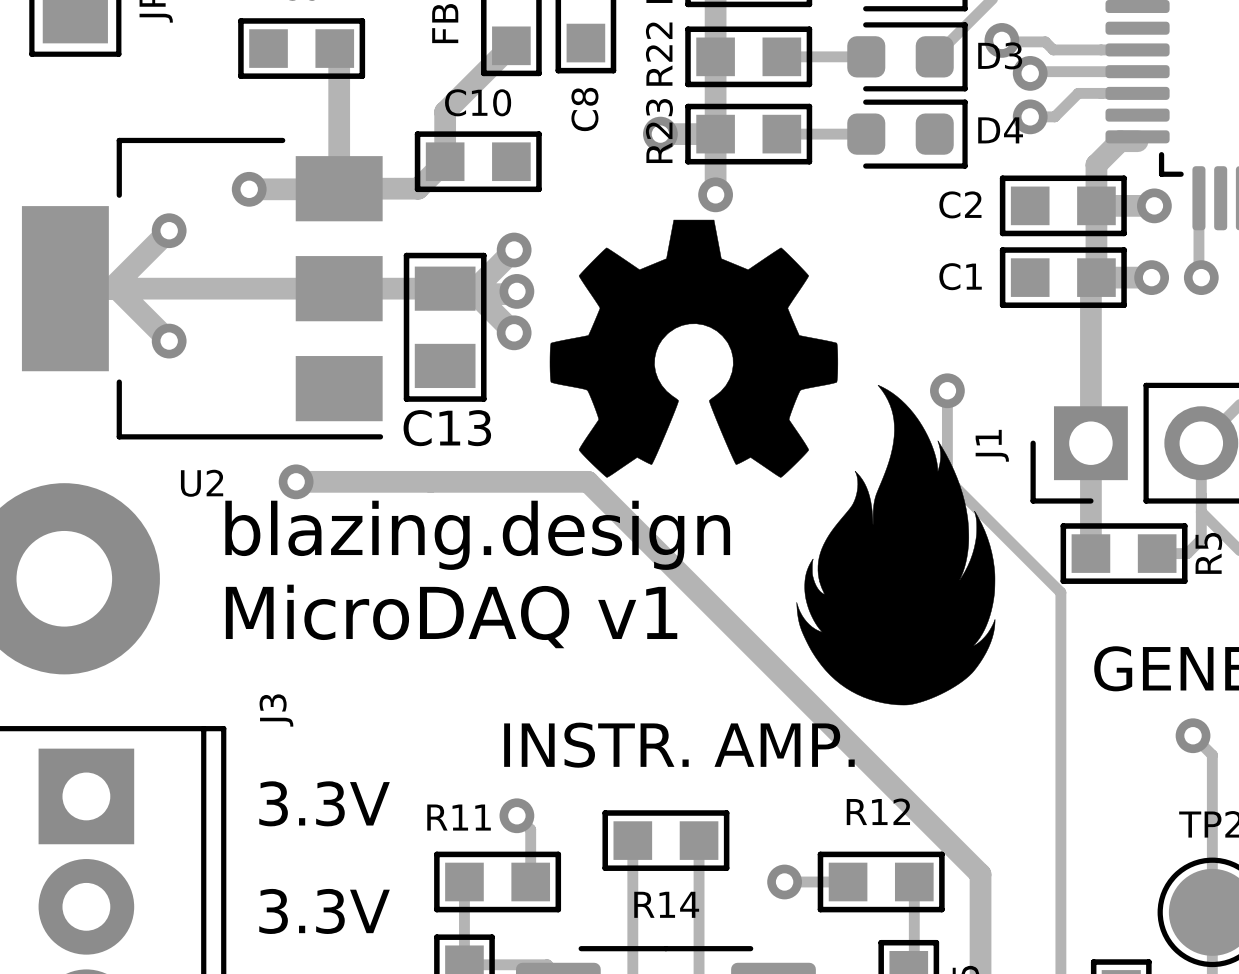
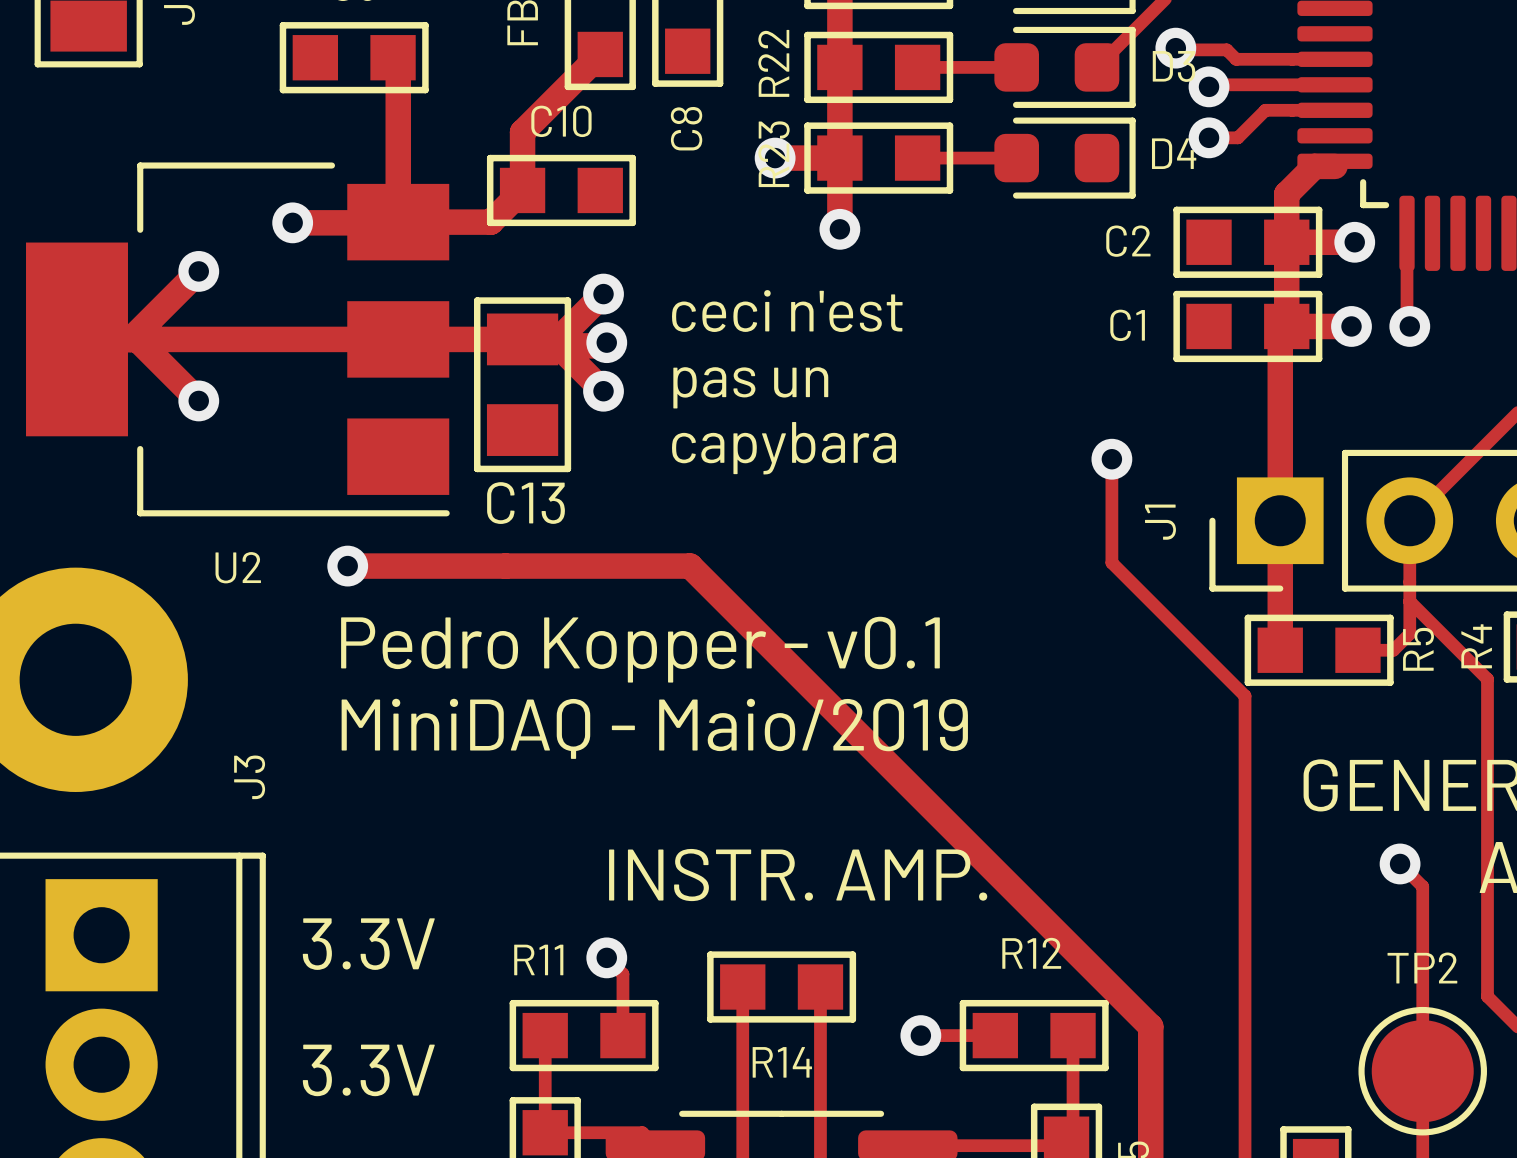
drawing: [549, 219, 996, 706] -> none
text: none -> ceci n'est (787, 311)
text: none -> pas un (750, 387)
text: none -> capybara (784, 448)
text: blazing.design (477, 535) -> none
text: none -> Pedro Kopper - v0.1 (640, 649)
text: MicroDAQ v1 (451, 616) -> none
text: none -> MiniDAQ - Maio/2019 (654, 728)
J3 name position: J3 (276, 710) -> J3 (249, 777)

